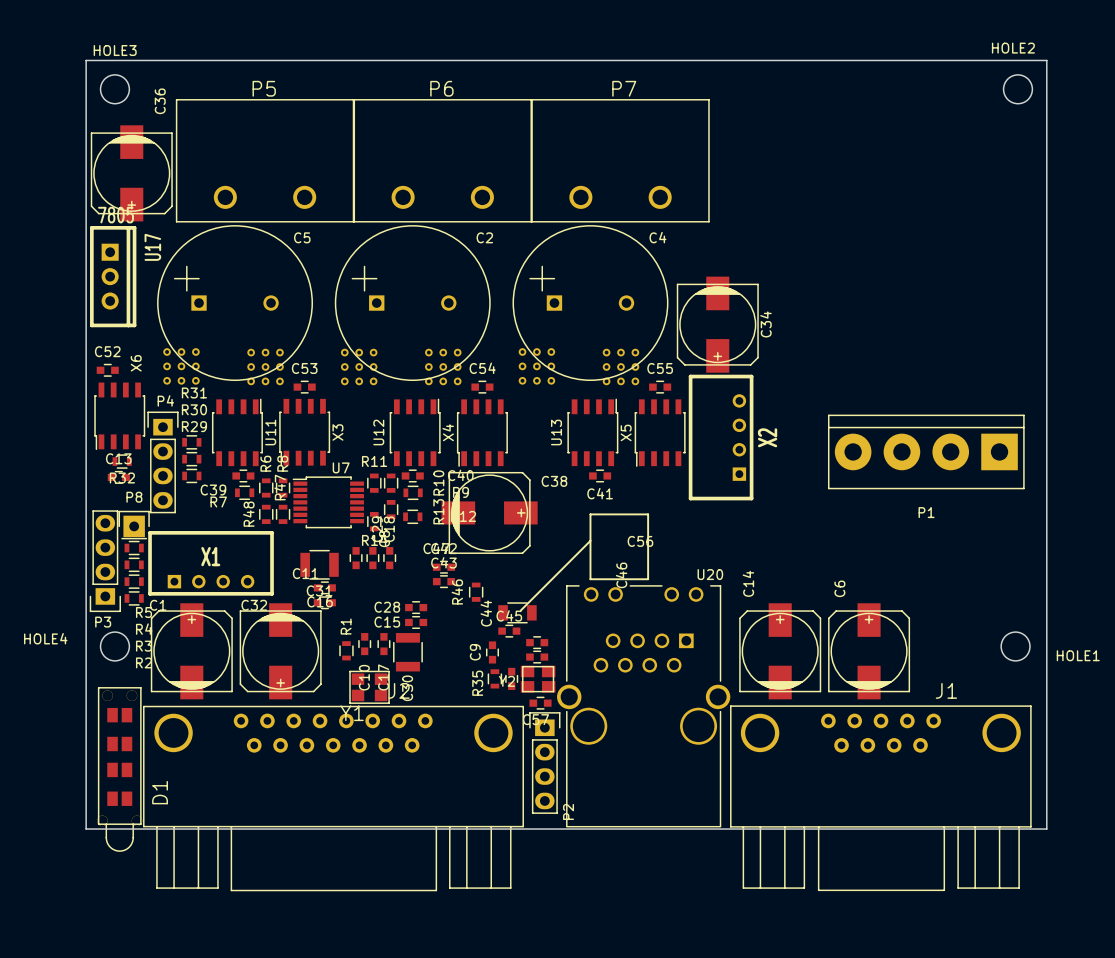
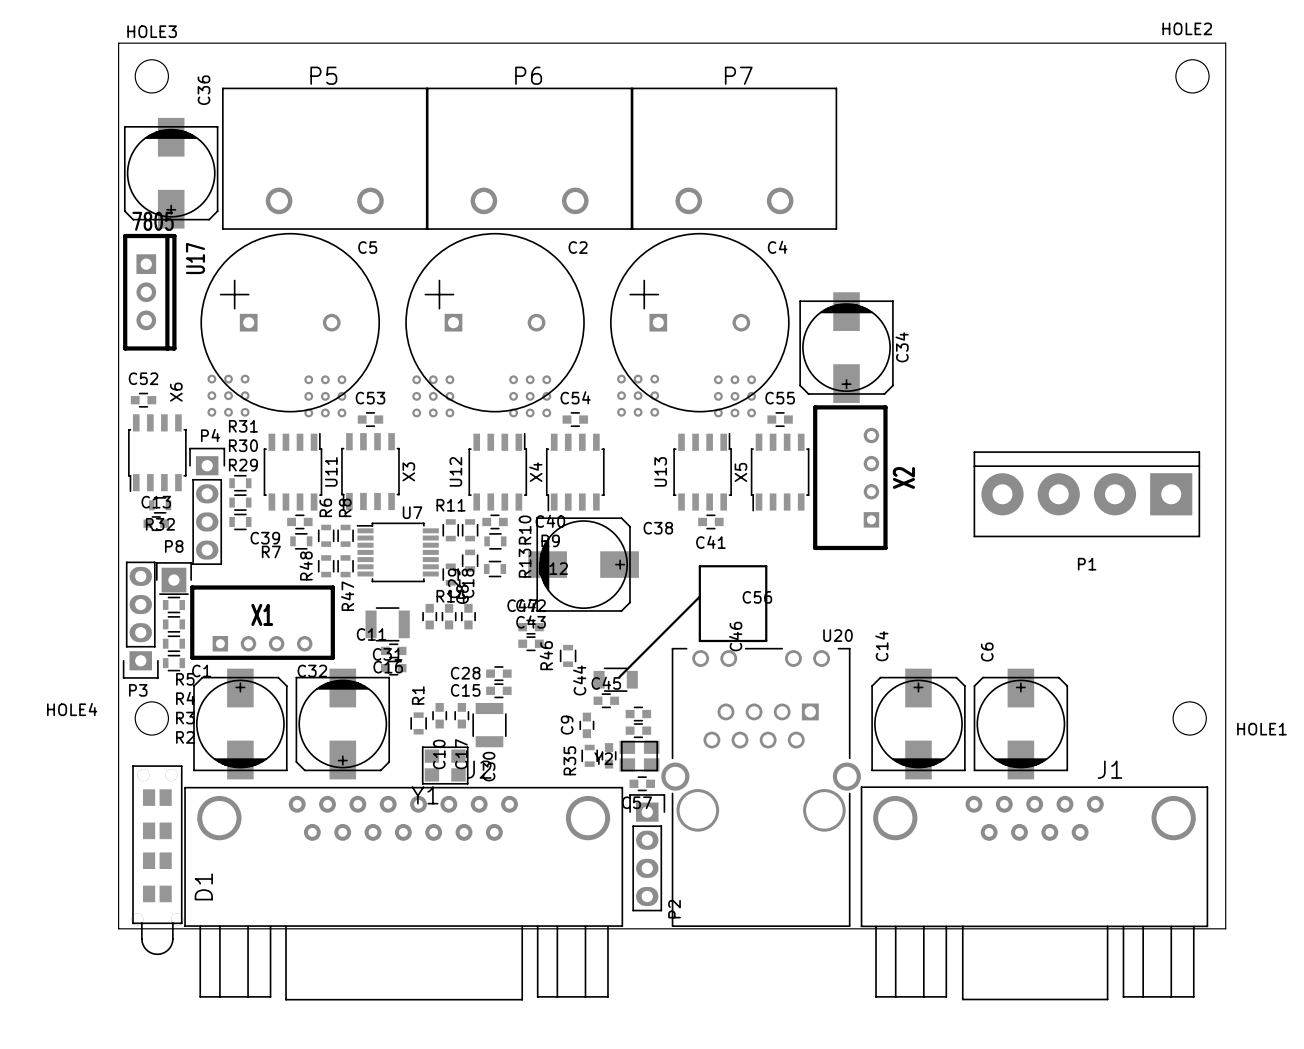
R47 name position: R47 (280, 487) -> R47 (347, 596)

